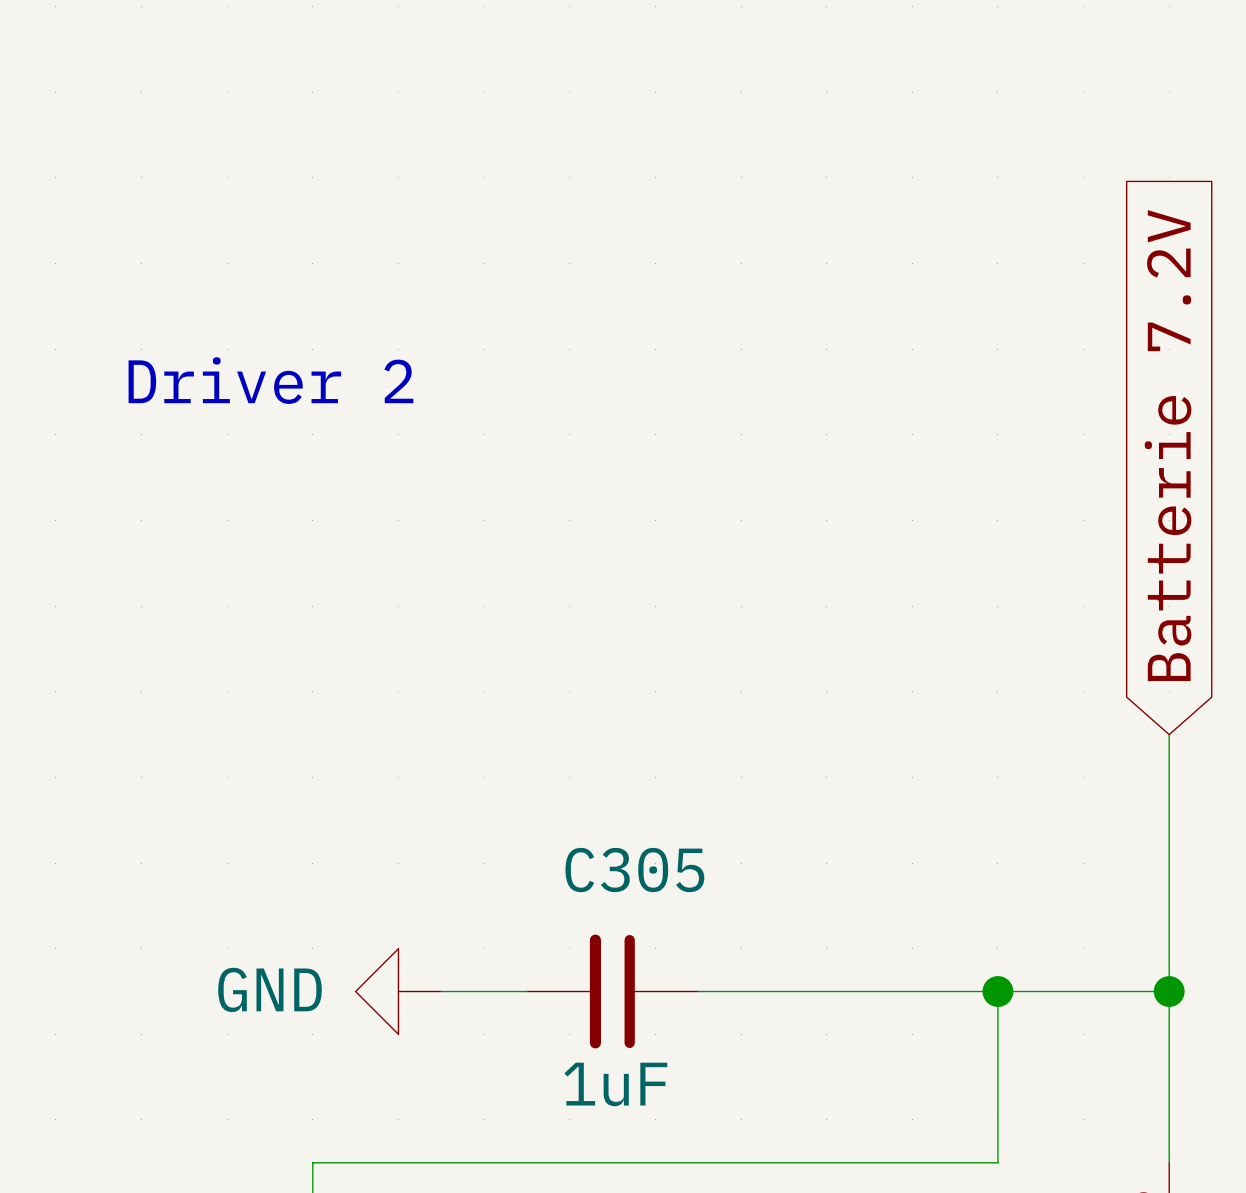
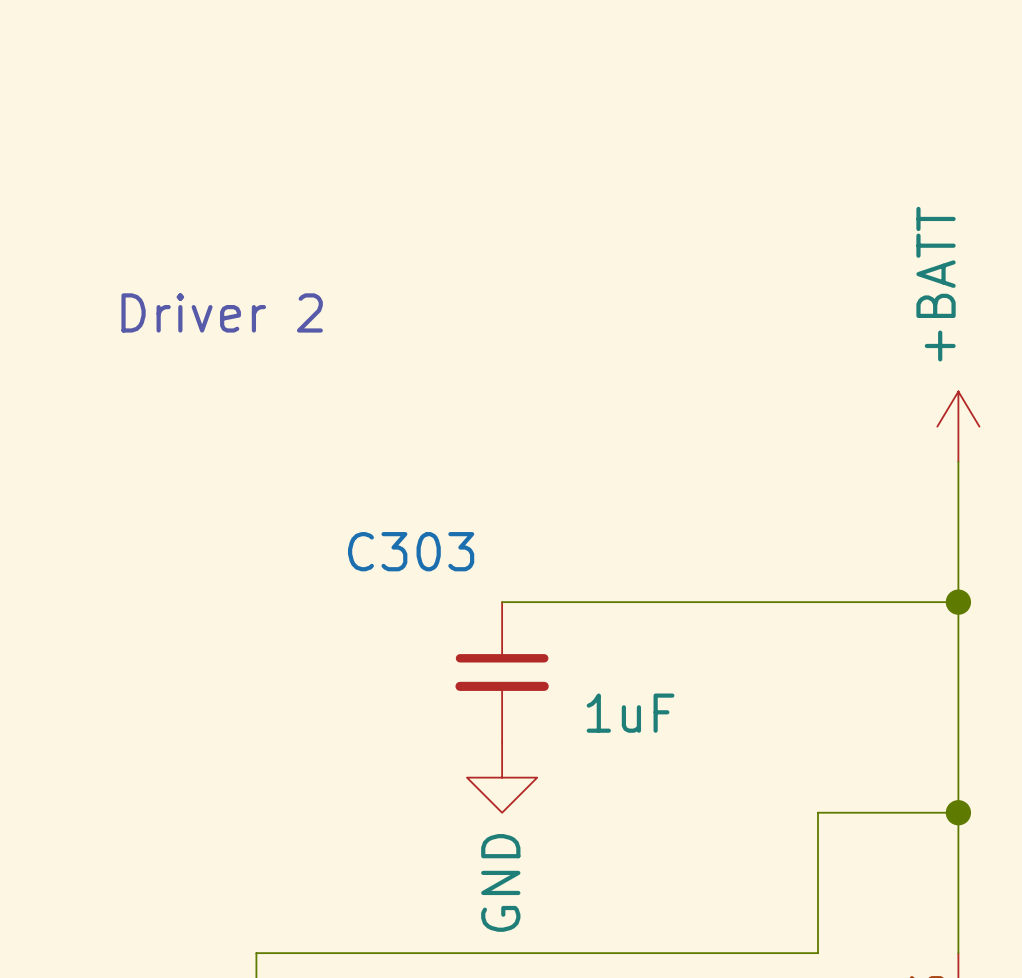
global label: Batterie 7.2V (1168, 445) -> none
power symbol: none -> +BATT (958, 426)
wire: none -> (958, 461) (958, 602) (502, 602)
junction: none -> (958, 602)
C303: none -> 1uF (502, 672)
power symbol rotation: 0° (398, 991) -> 90° counterclockwise (502, 777)
power symbol position: GND (398, 991) -> GND (502, 777)
wire: (441, 991) (526, 991) -> none
C305: 1uF (612, 991) -> none
wire: (698, 991) (997, 991) -> none
junction: (997, 991) -> none

